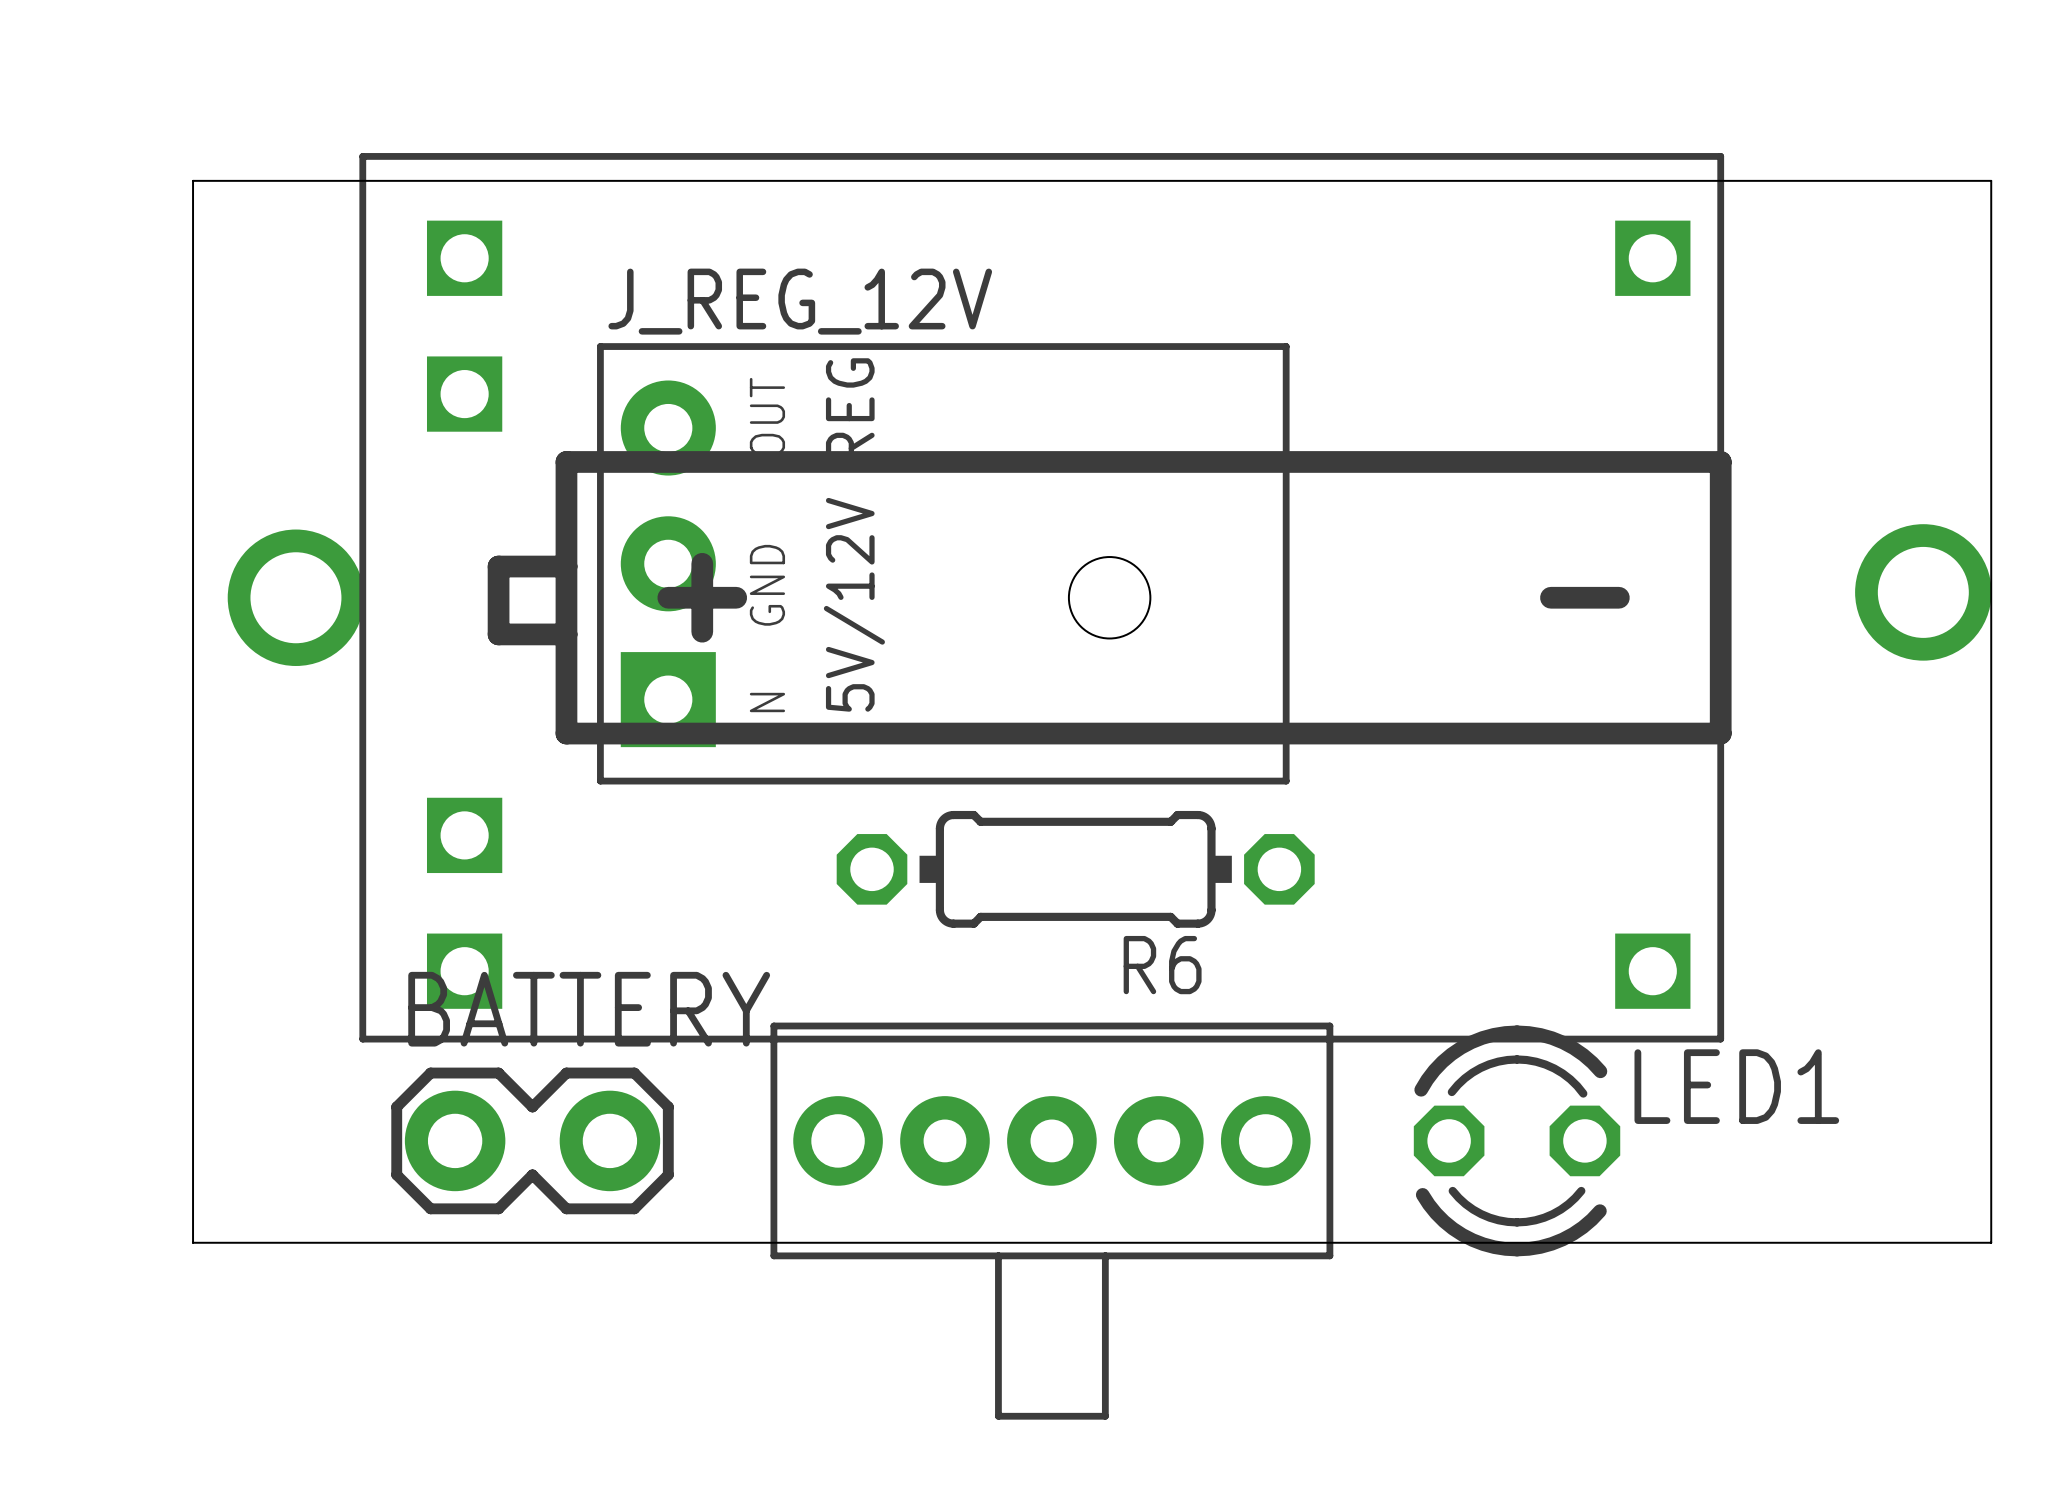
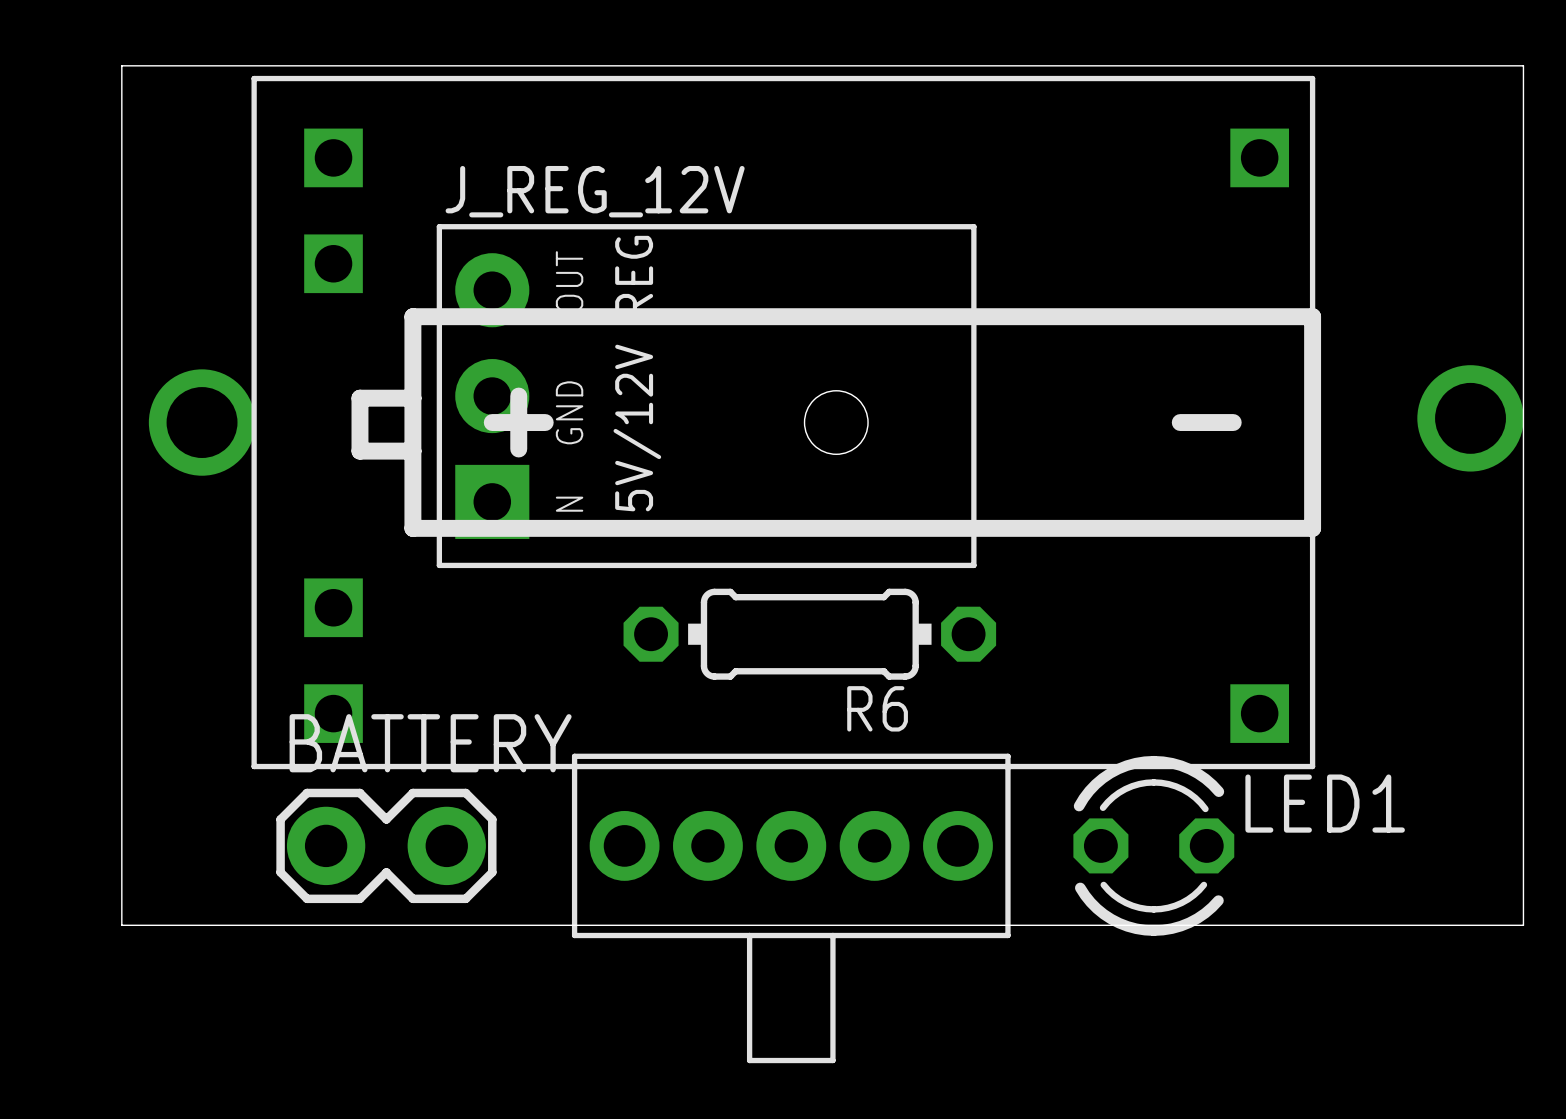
board edge: (193, 180) (1991, 180) -> (121, 97) (121, 65) (1523, 65) (1523, 97)

